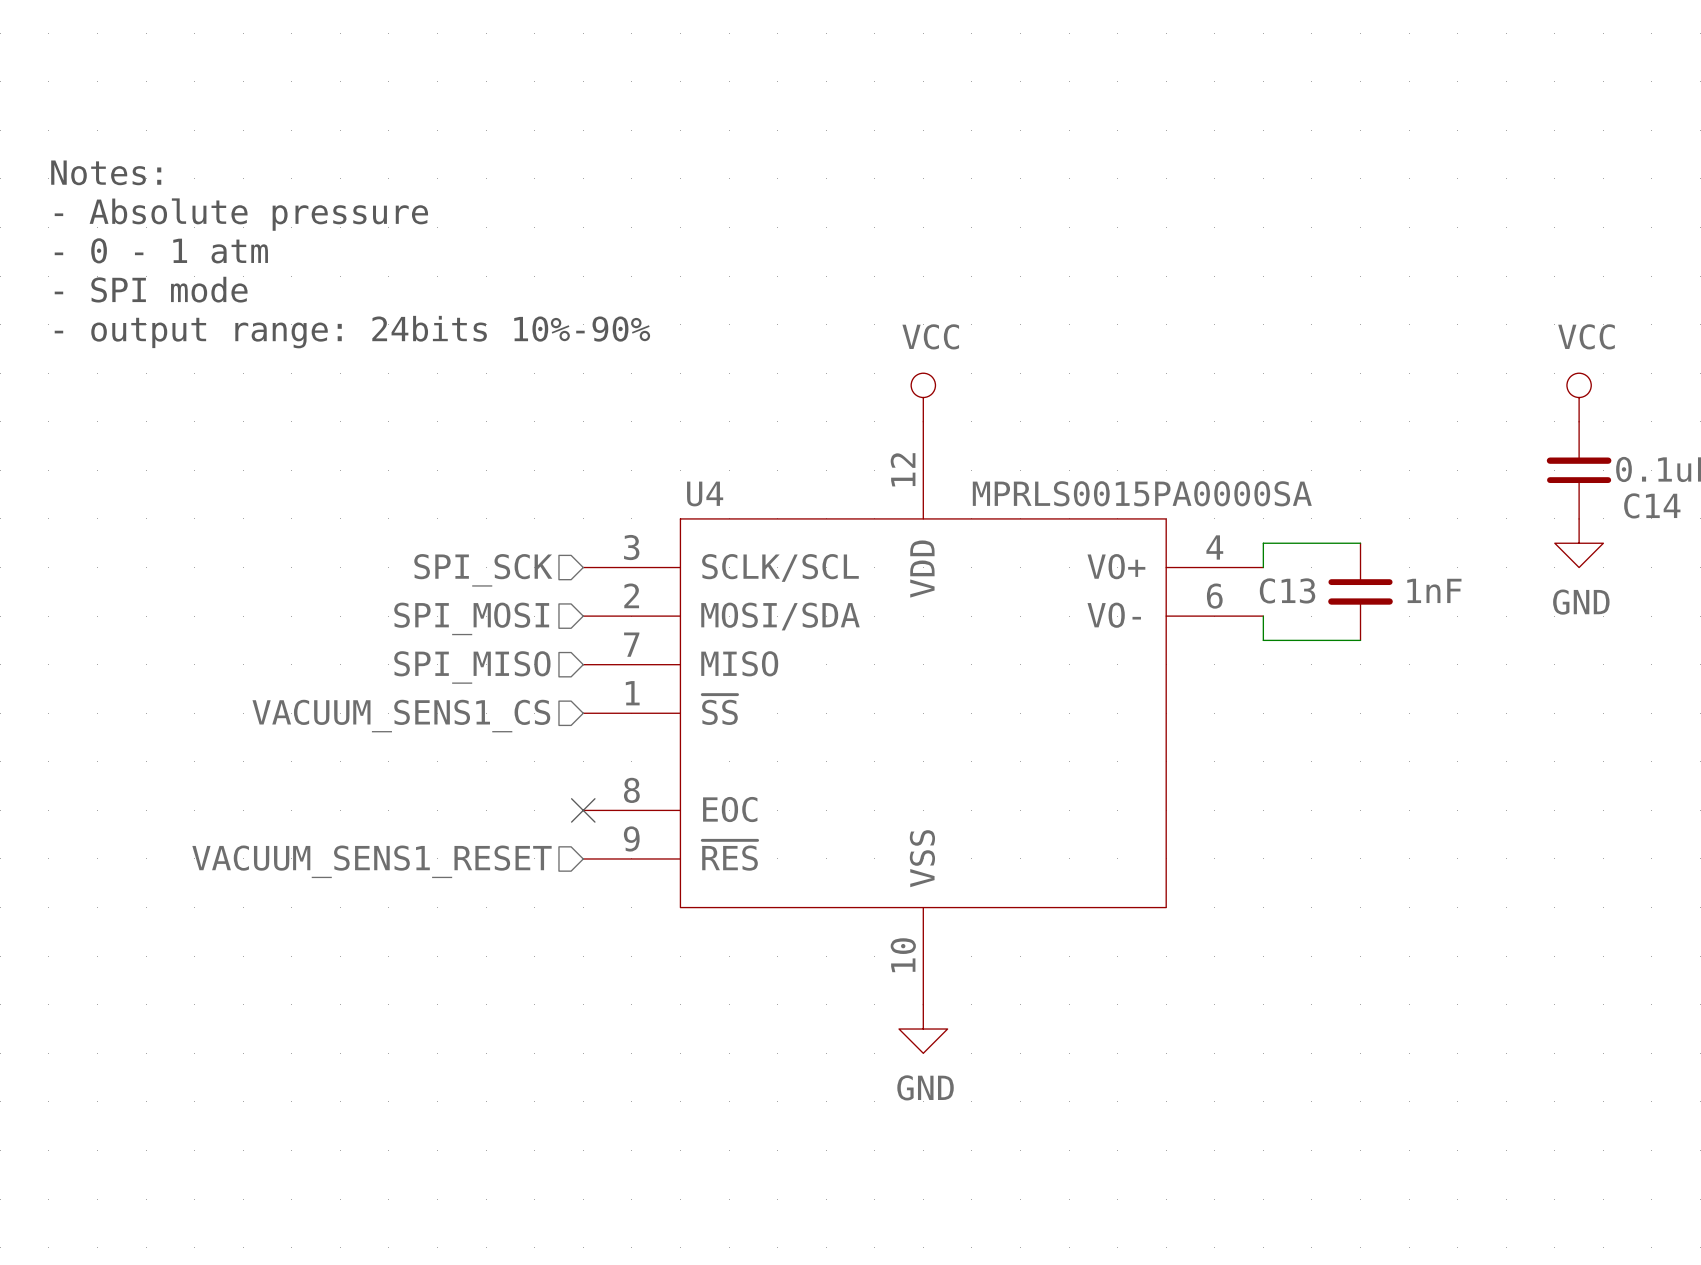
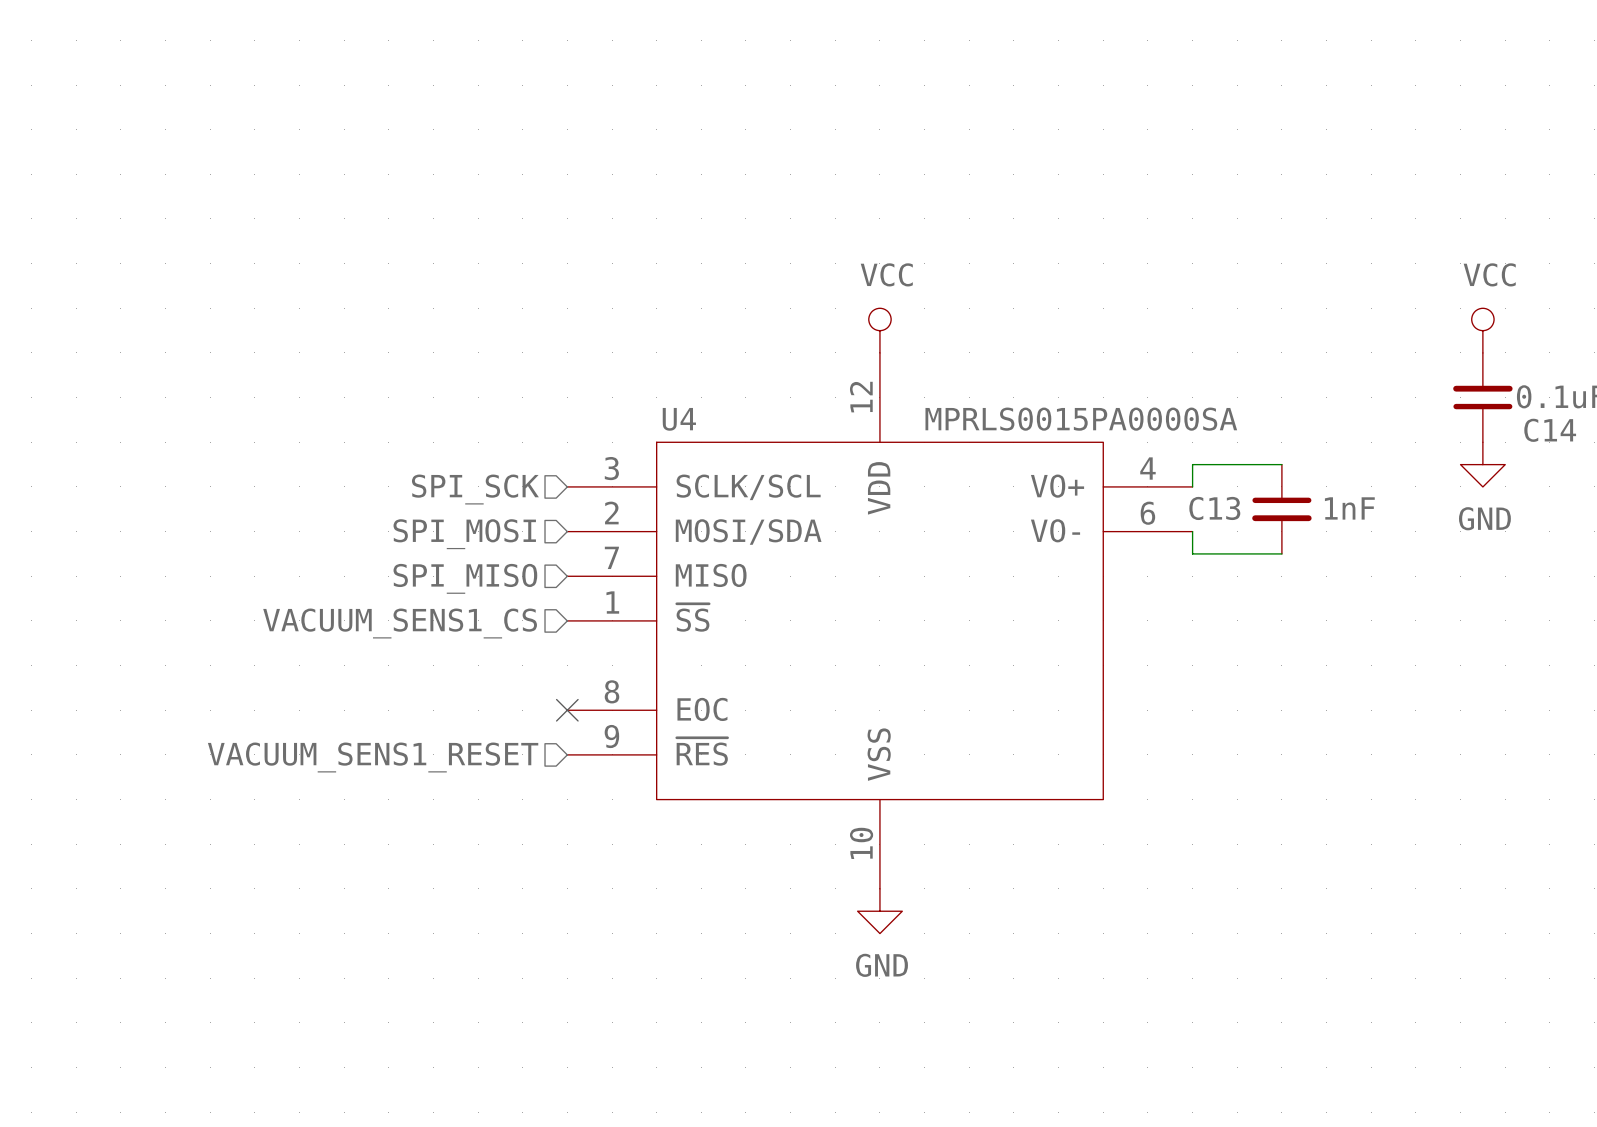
text: Notes: (106, 172) -> none
text: - Absolute pressure (241, 214) -> none
text: - 0 - 1 atm (161, 250) -> none
text: - SPI mode (151, 289) -> none
text: - output range: 24bits 10%-90% (352, 332) -> none

